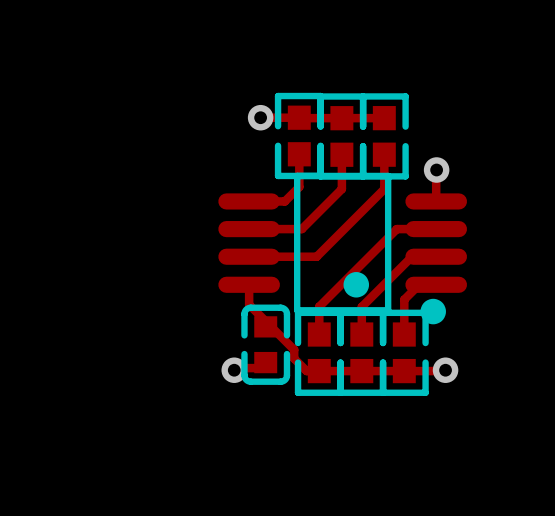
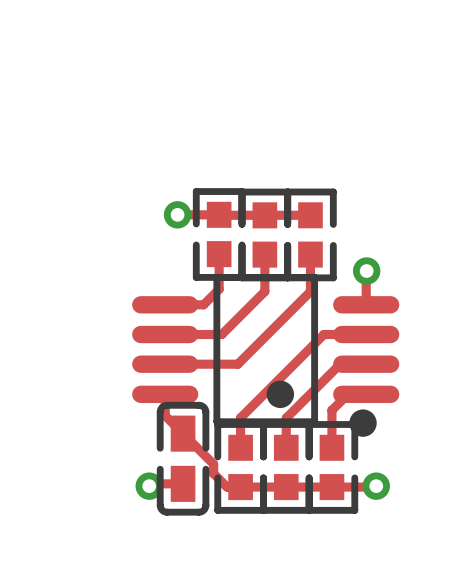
part footprint: [241, 304, 291, 385] -> [156, 401, 210, 516]

